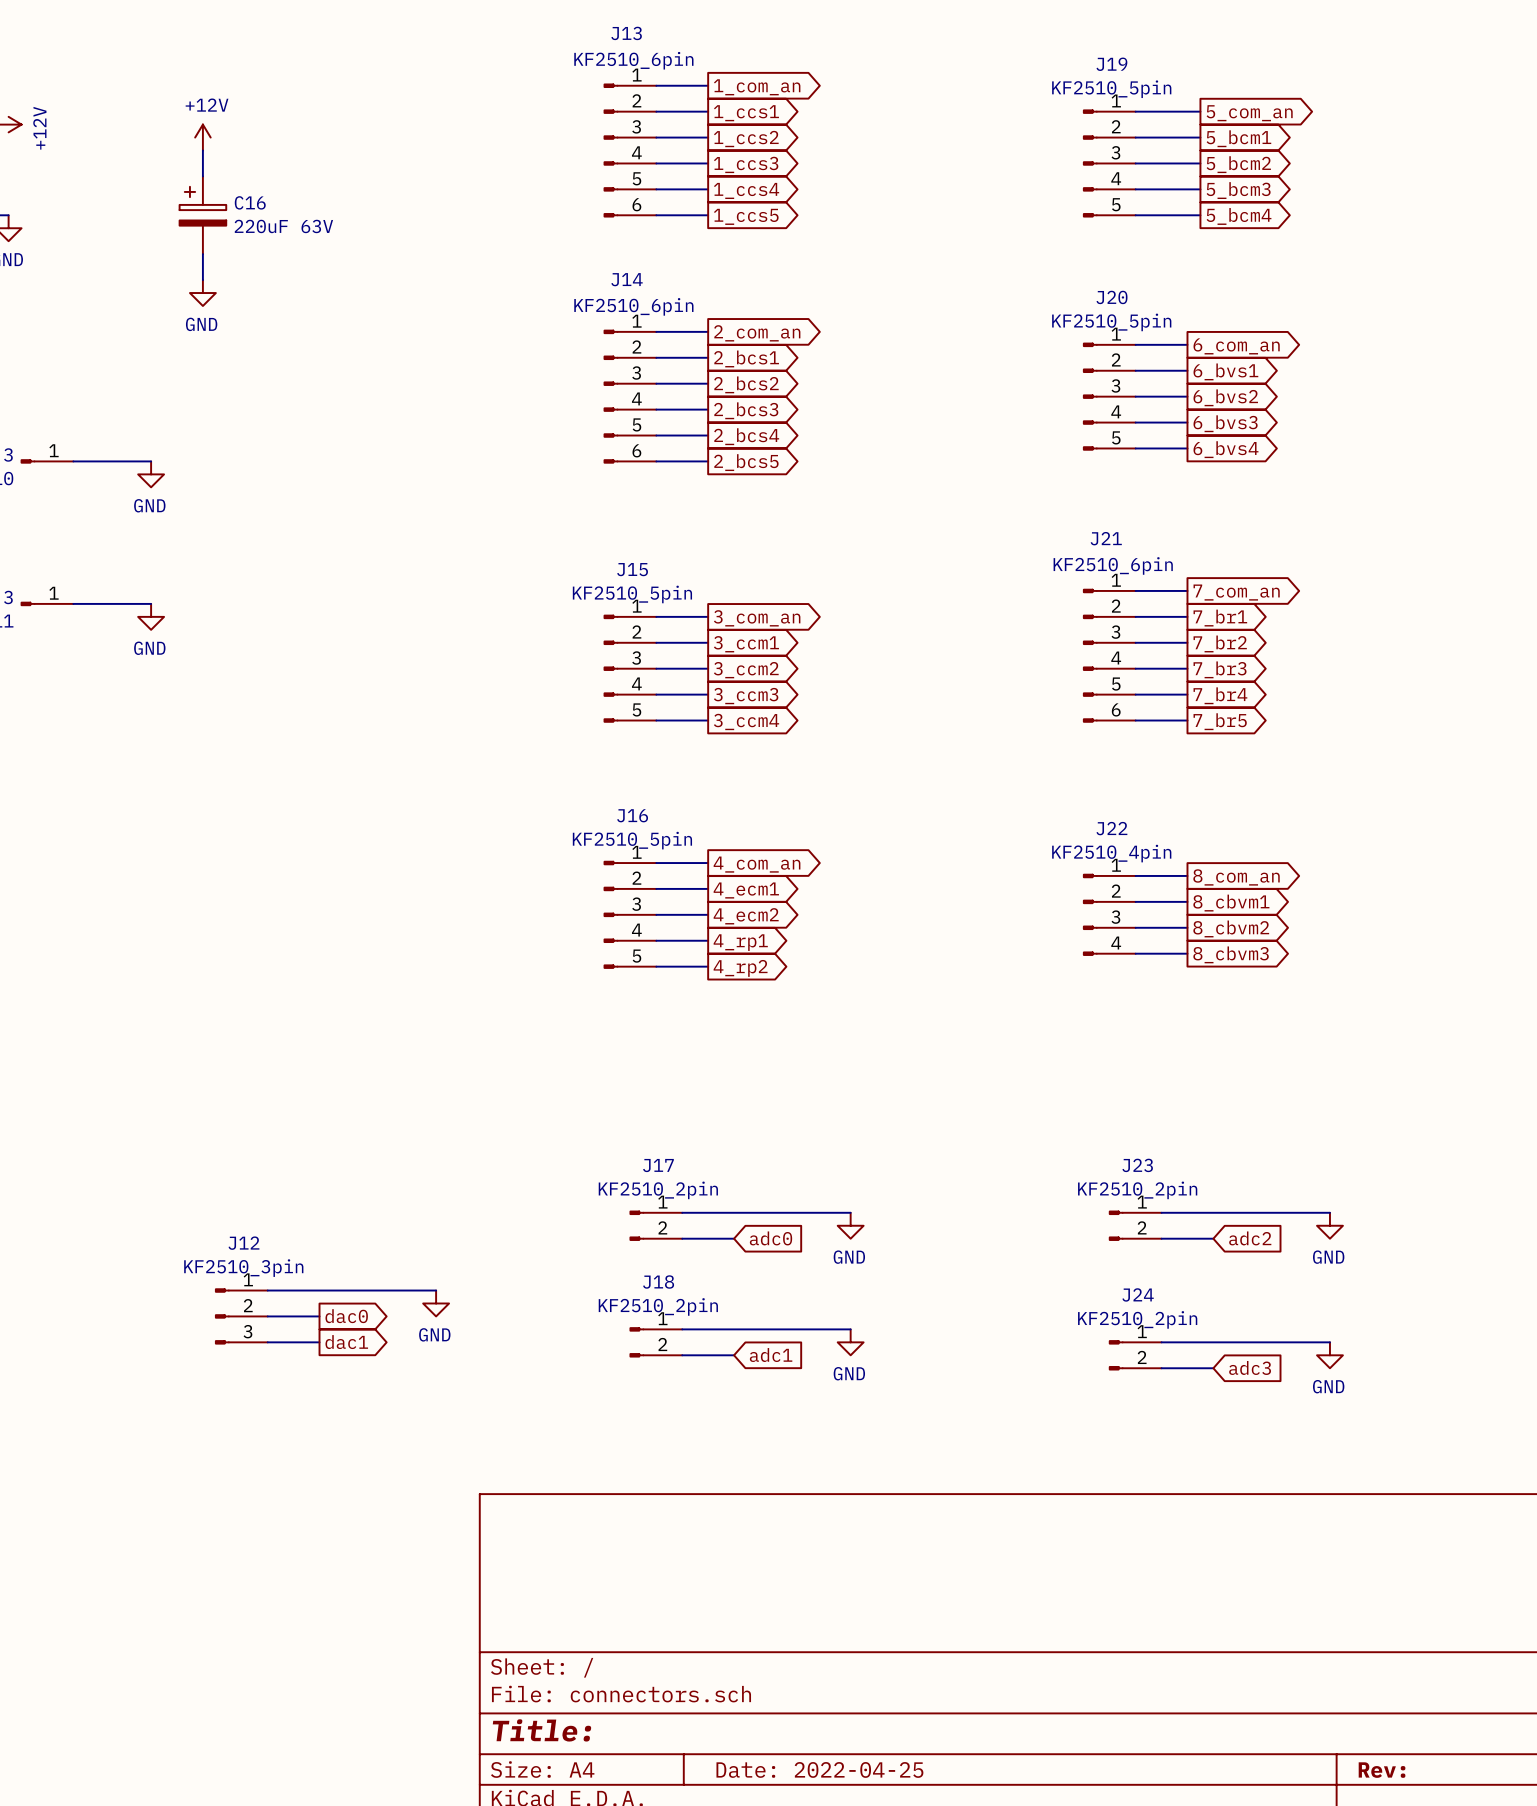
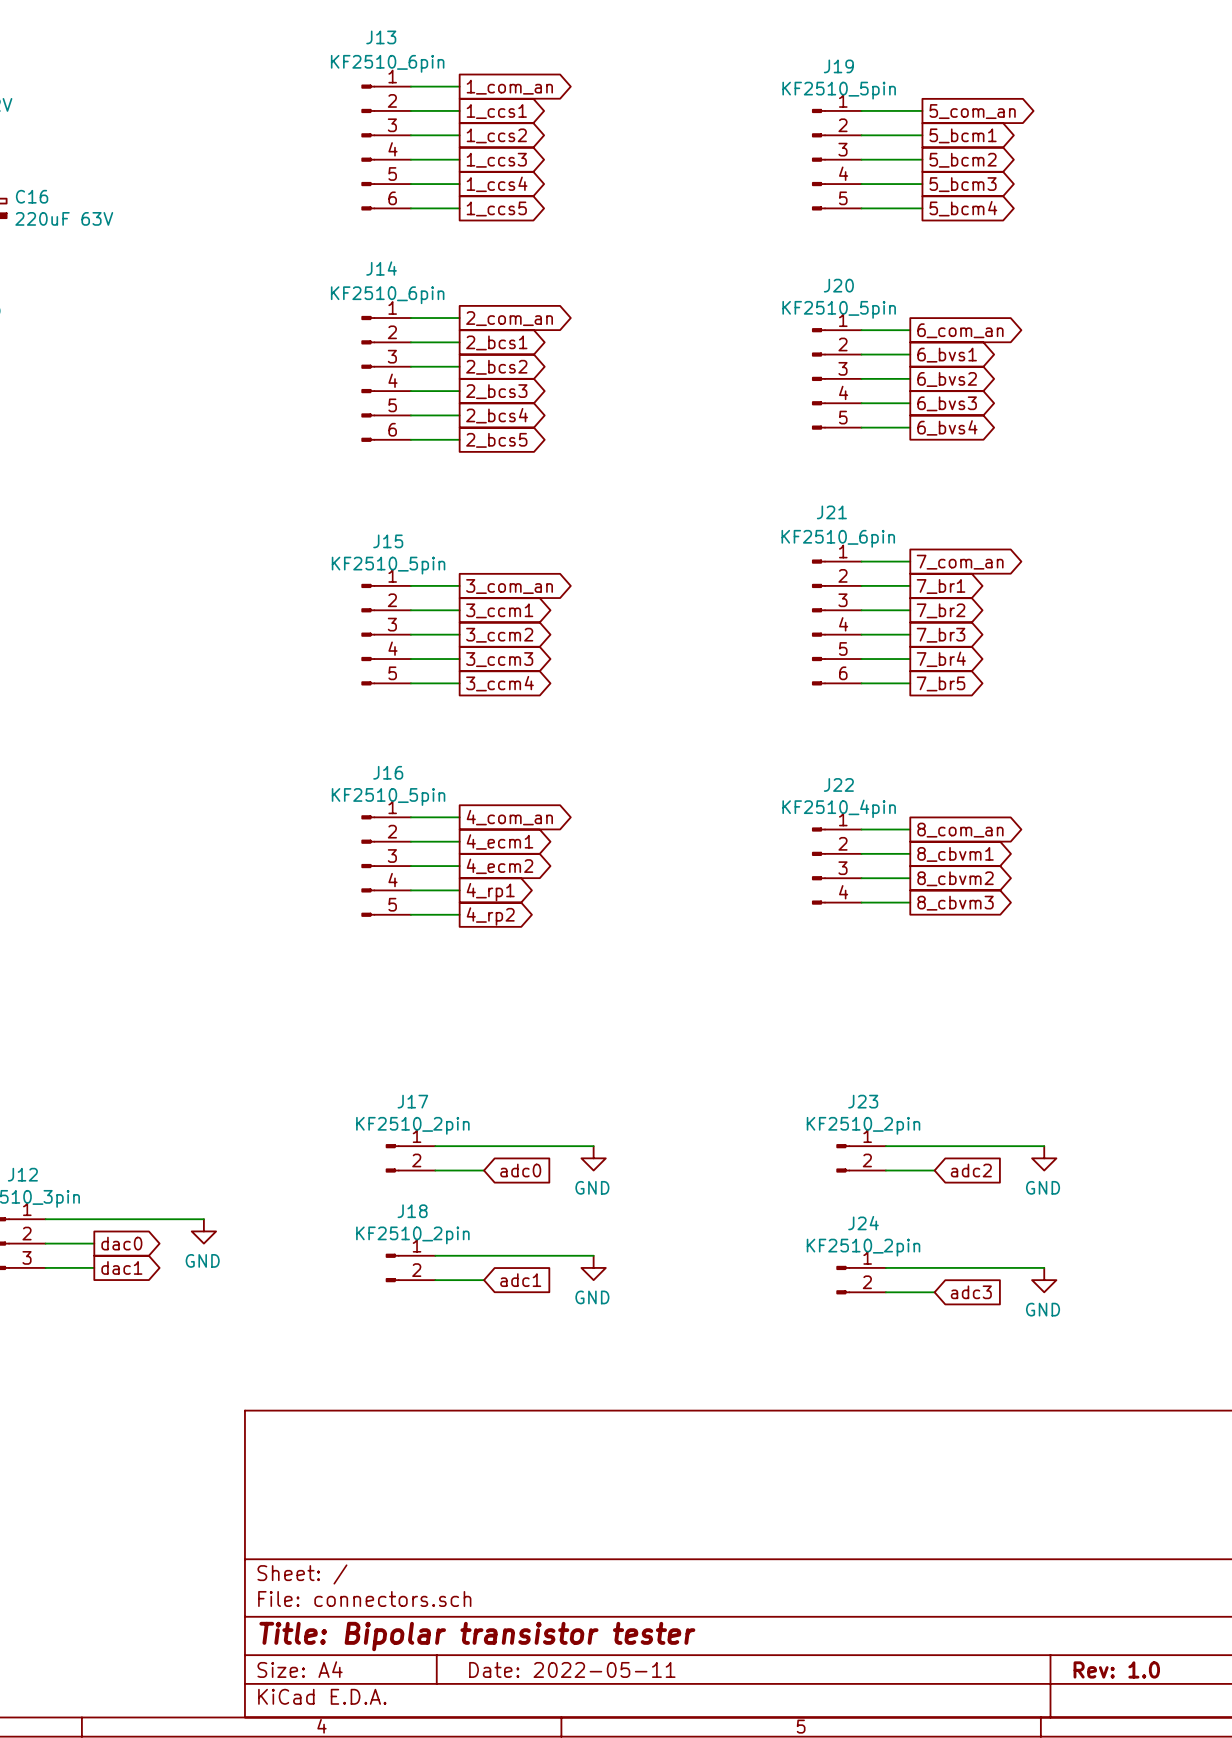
title block: Title: (542, 1730) -> Title: Bipolar transistor tester (477, 1636)
title block: Date: 2022-04-25 (819, 1769) -> Date: 2022-05-11 (572, 1669)
title block: Rev: (1382, 1770) -> Rev: 1.0 (1116, 1669)

